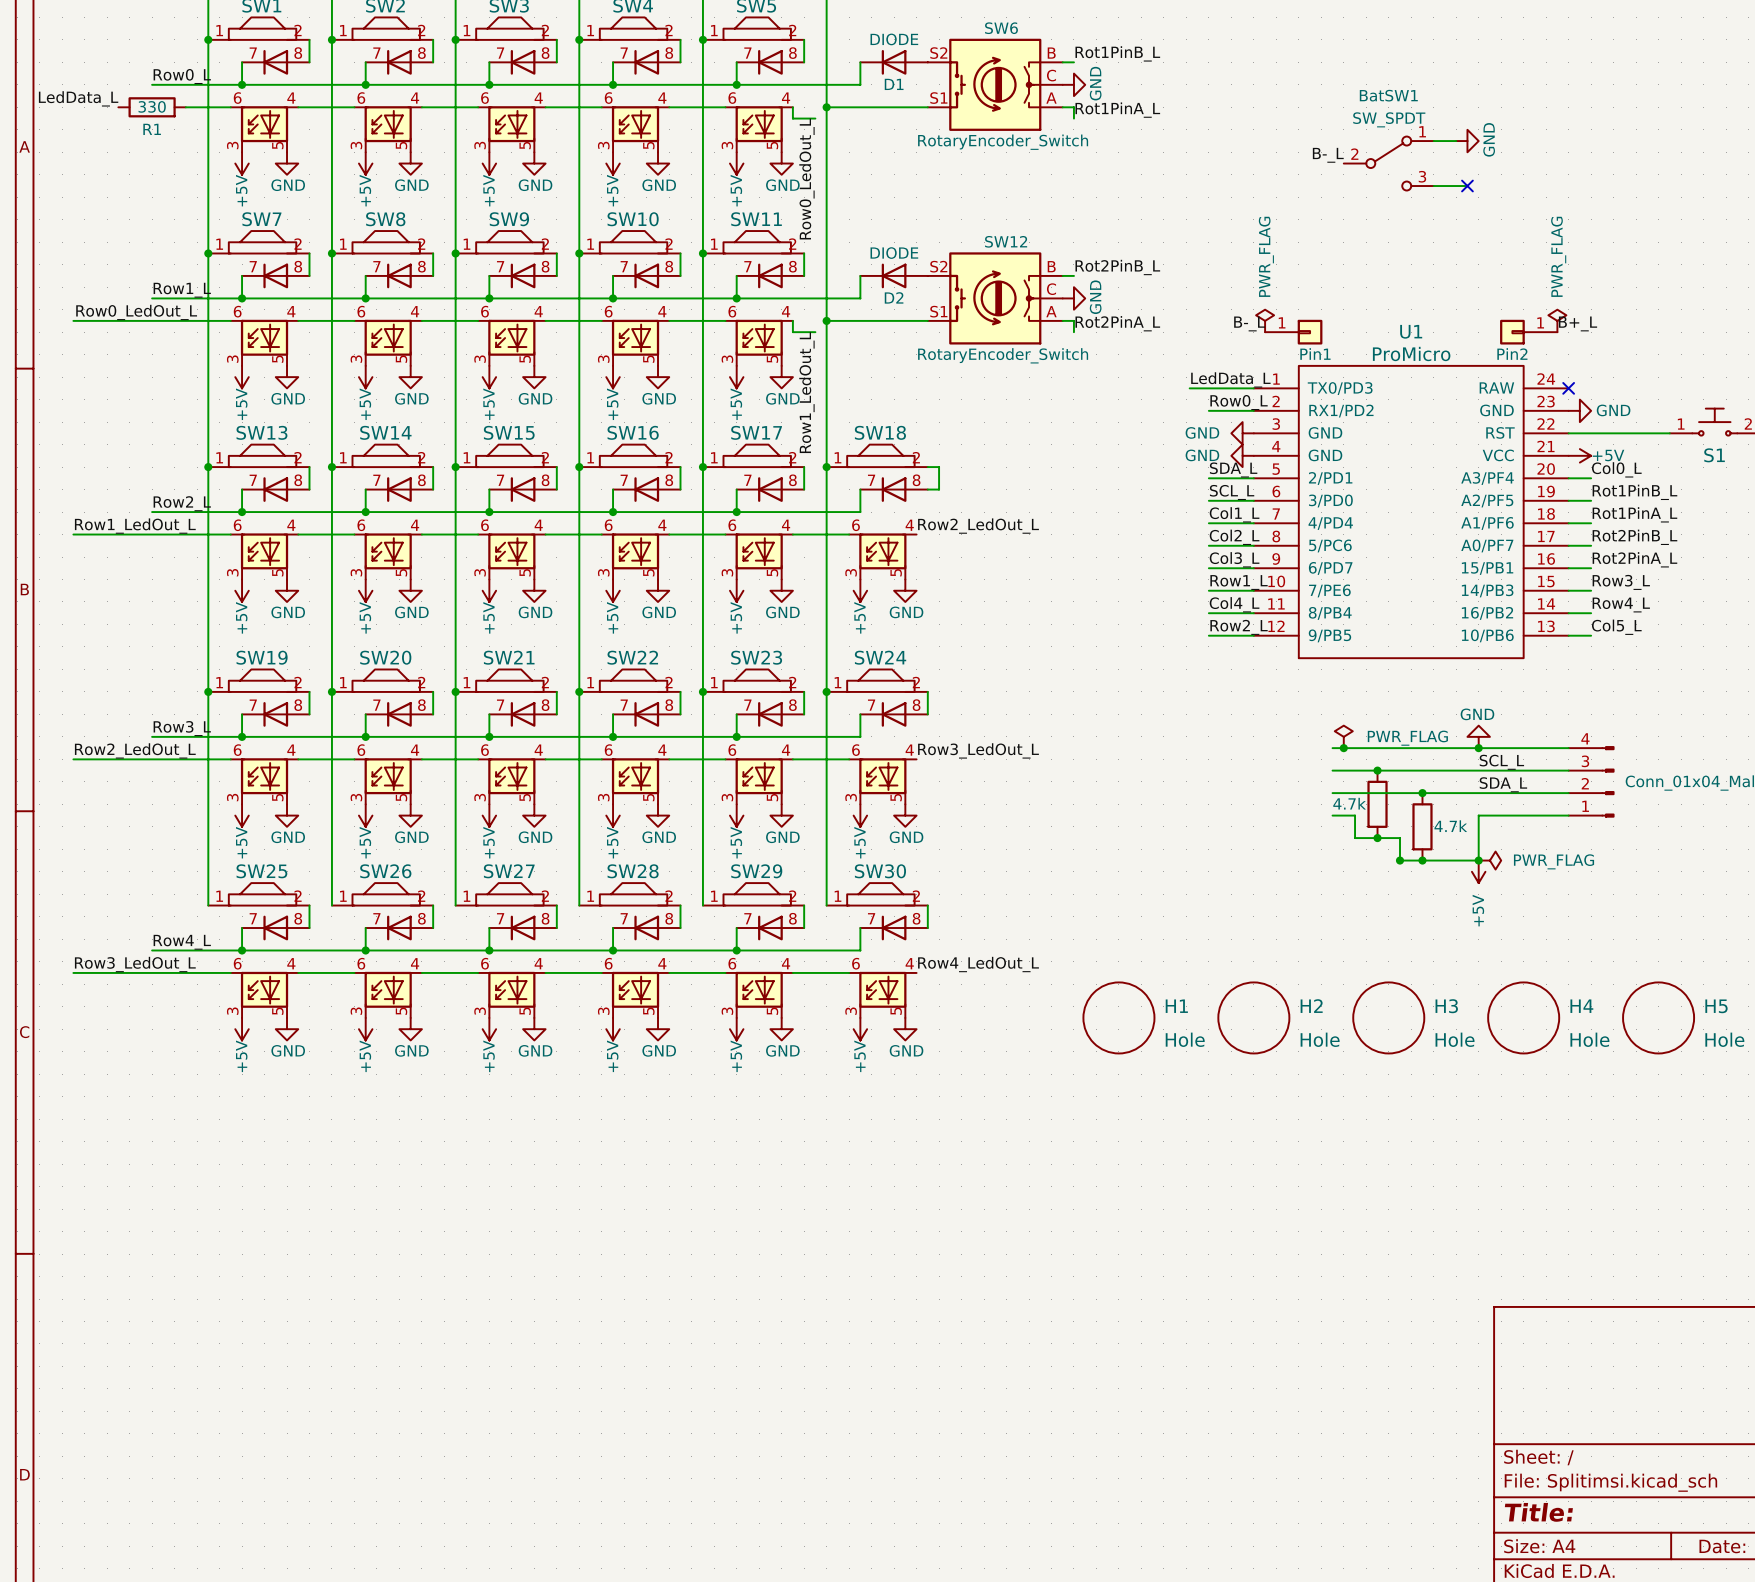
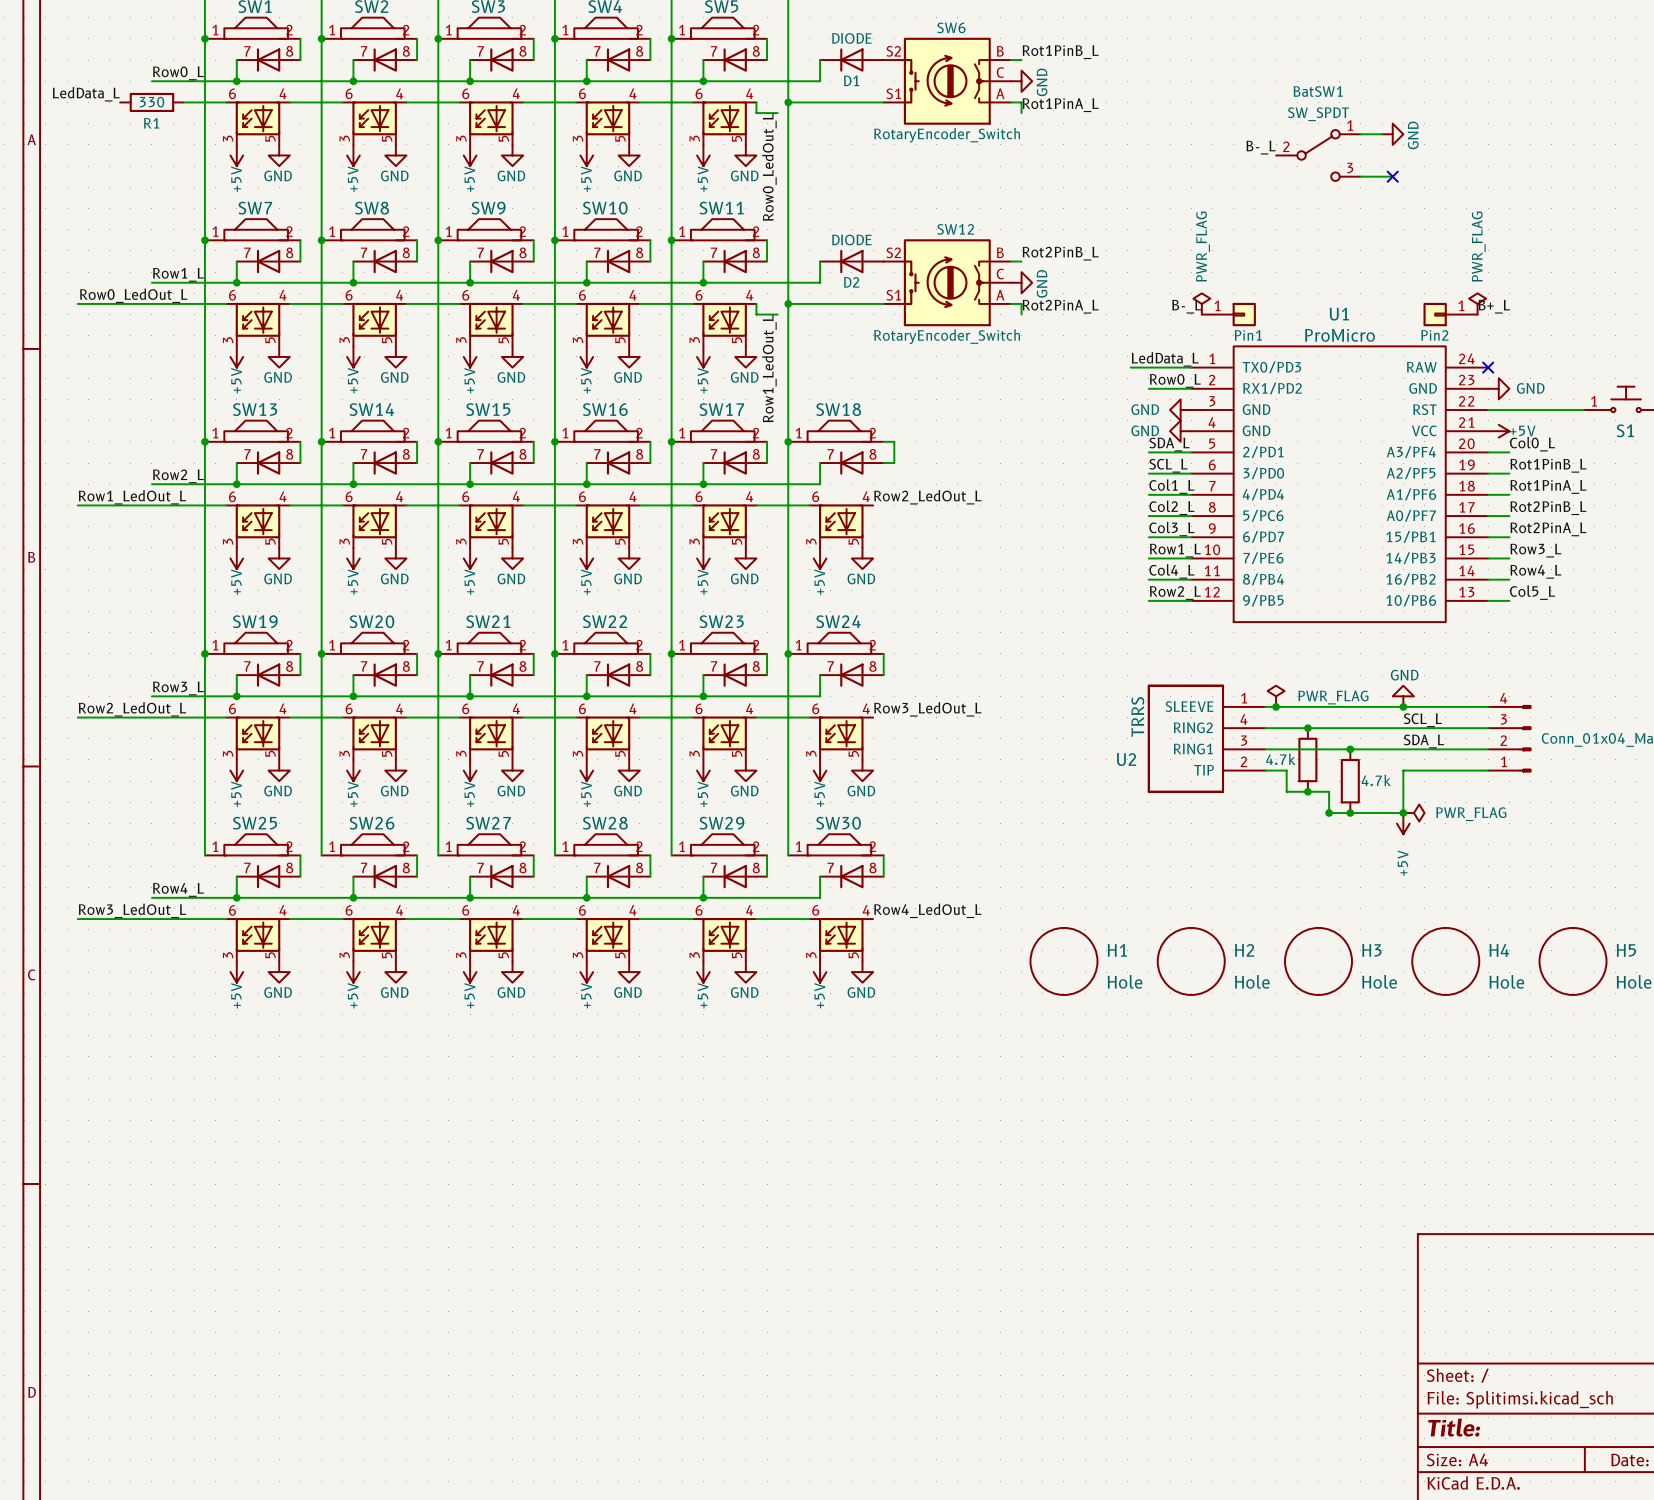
U2: none -> TRRS (1207, 738)

